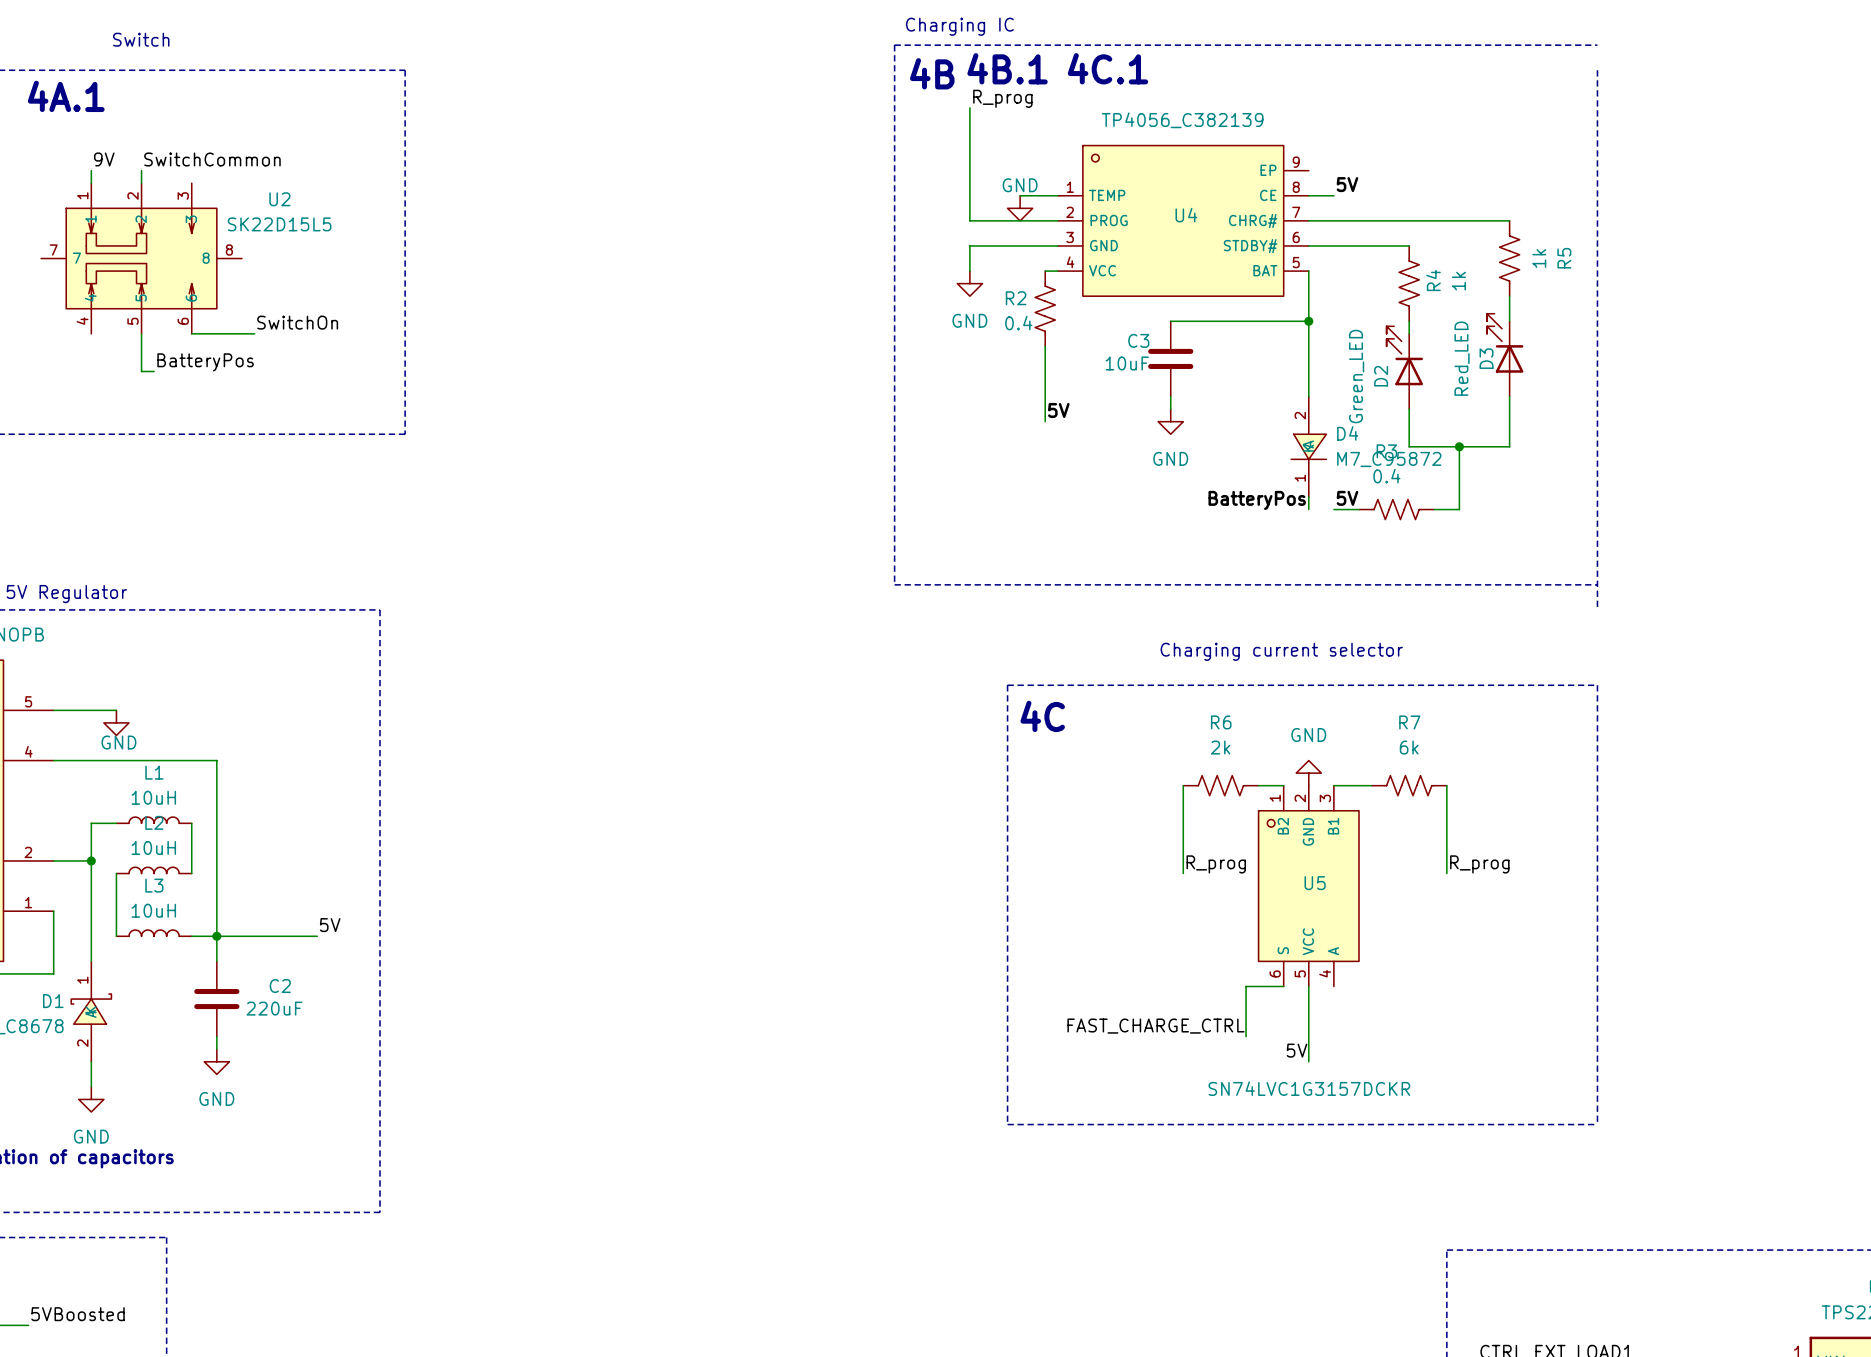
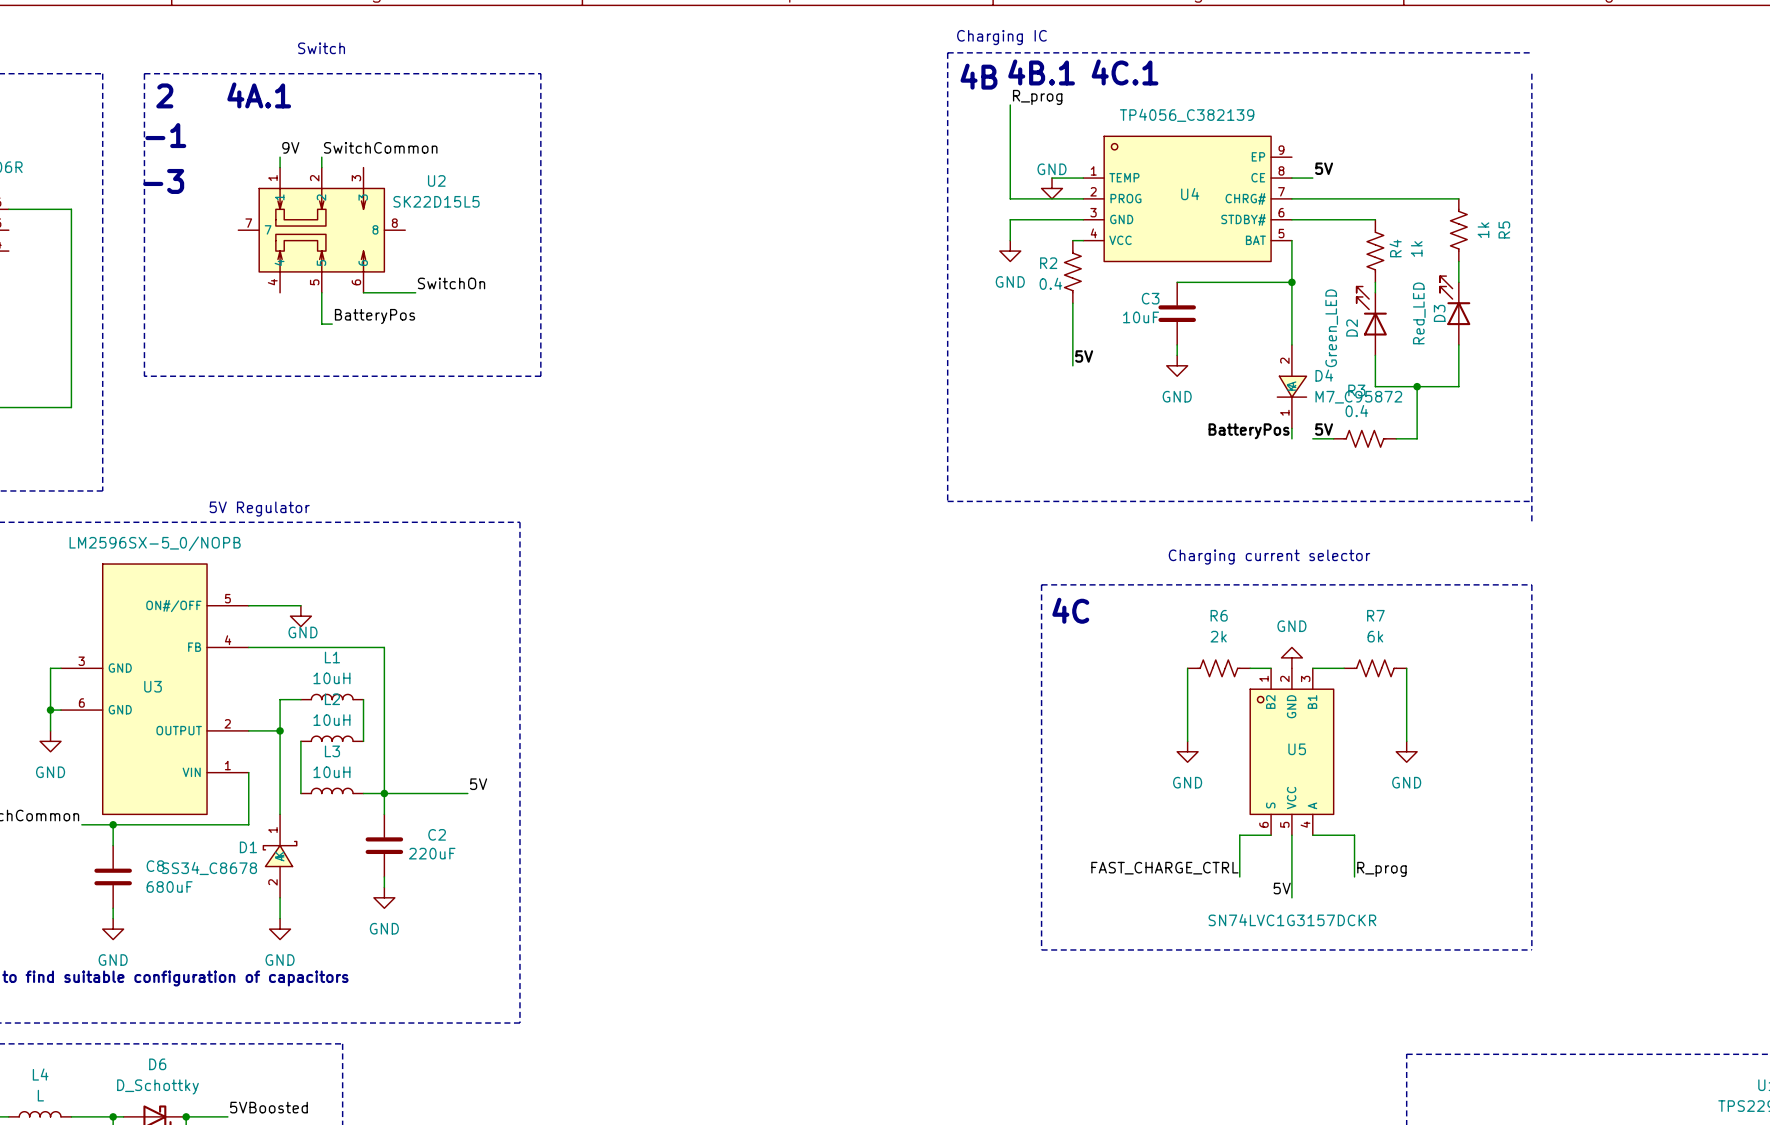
label: R_prog (1216, 864) -> none
label: R_prog (1479, 864) -> none
power symbol: none -> GND (1187, 751)
power symbol: none -> GND (1406, 751)
wire: none -> (1312, 835) (1354, 835) (1354, 876)
label: none -> R_prog (1381, 869)

